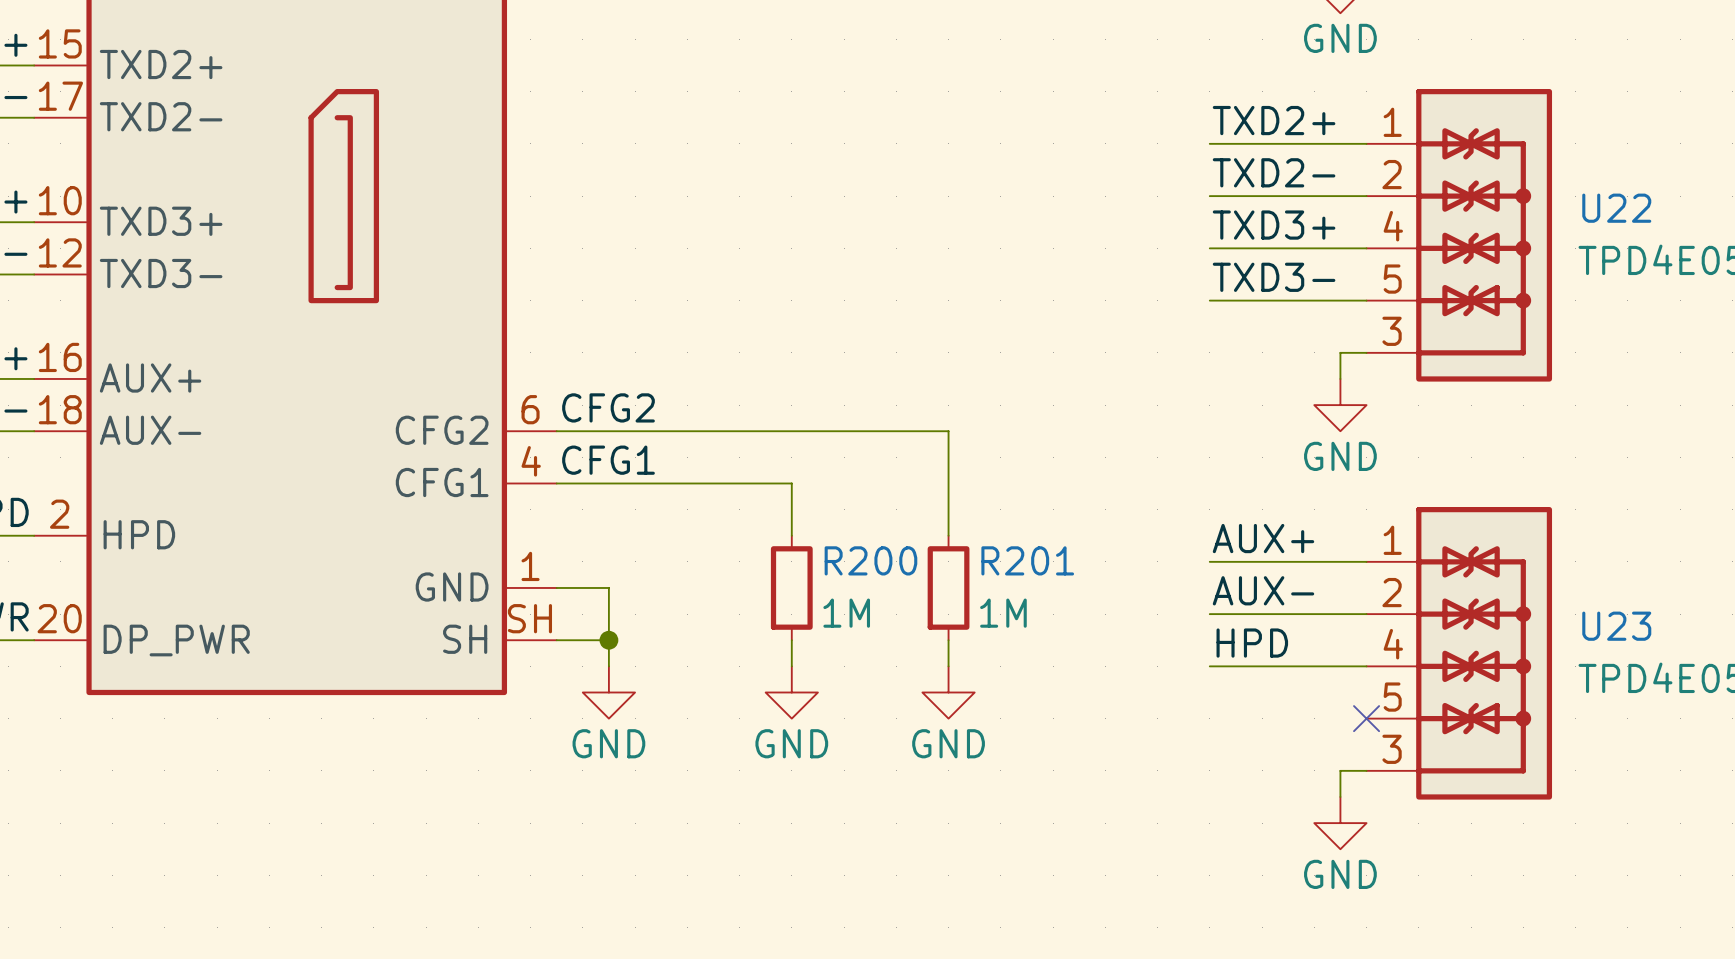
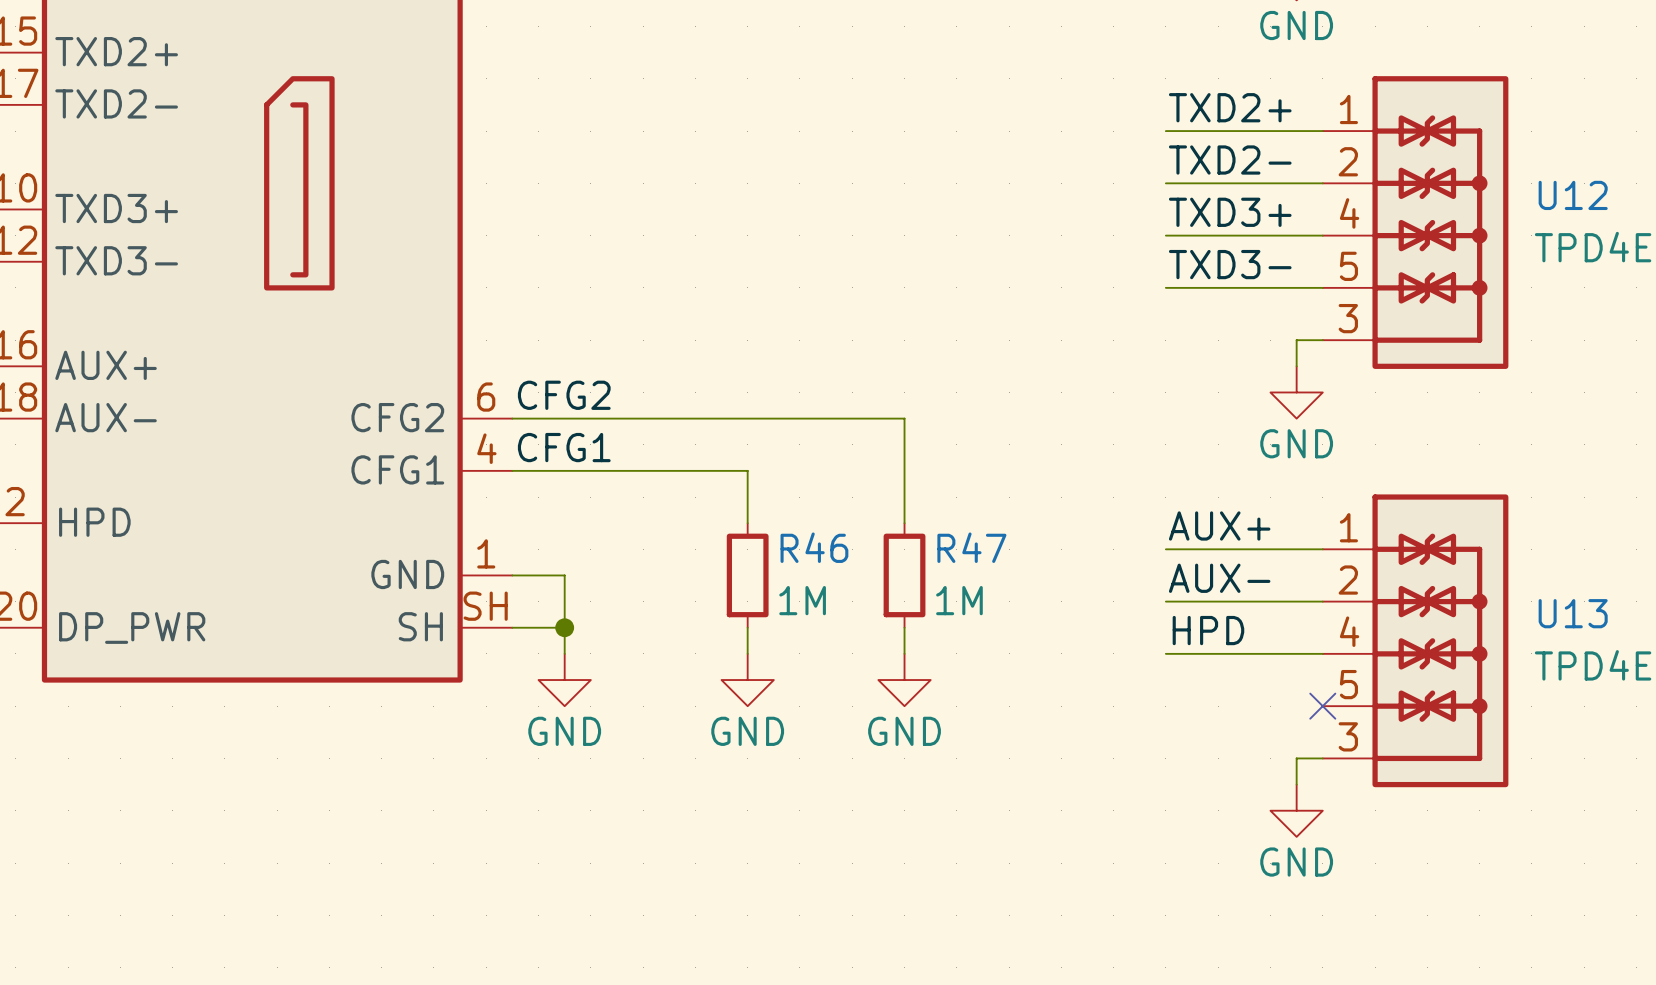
U22 name: U22 (1616, 208) -> U12 (1573, 195)
R200 name: R200 (870, 560) -> R46 (814, 547)
R201 name: R201 (1027, 560) -> R47 (971, 547)
U23 name: U23 (1616, 626) -> U13 (1573, 613)

